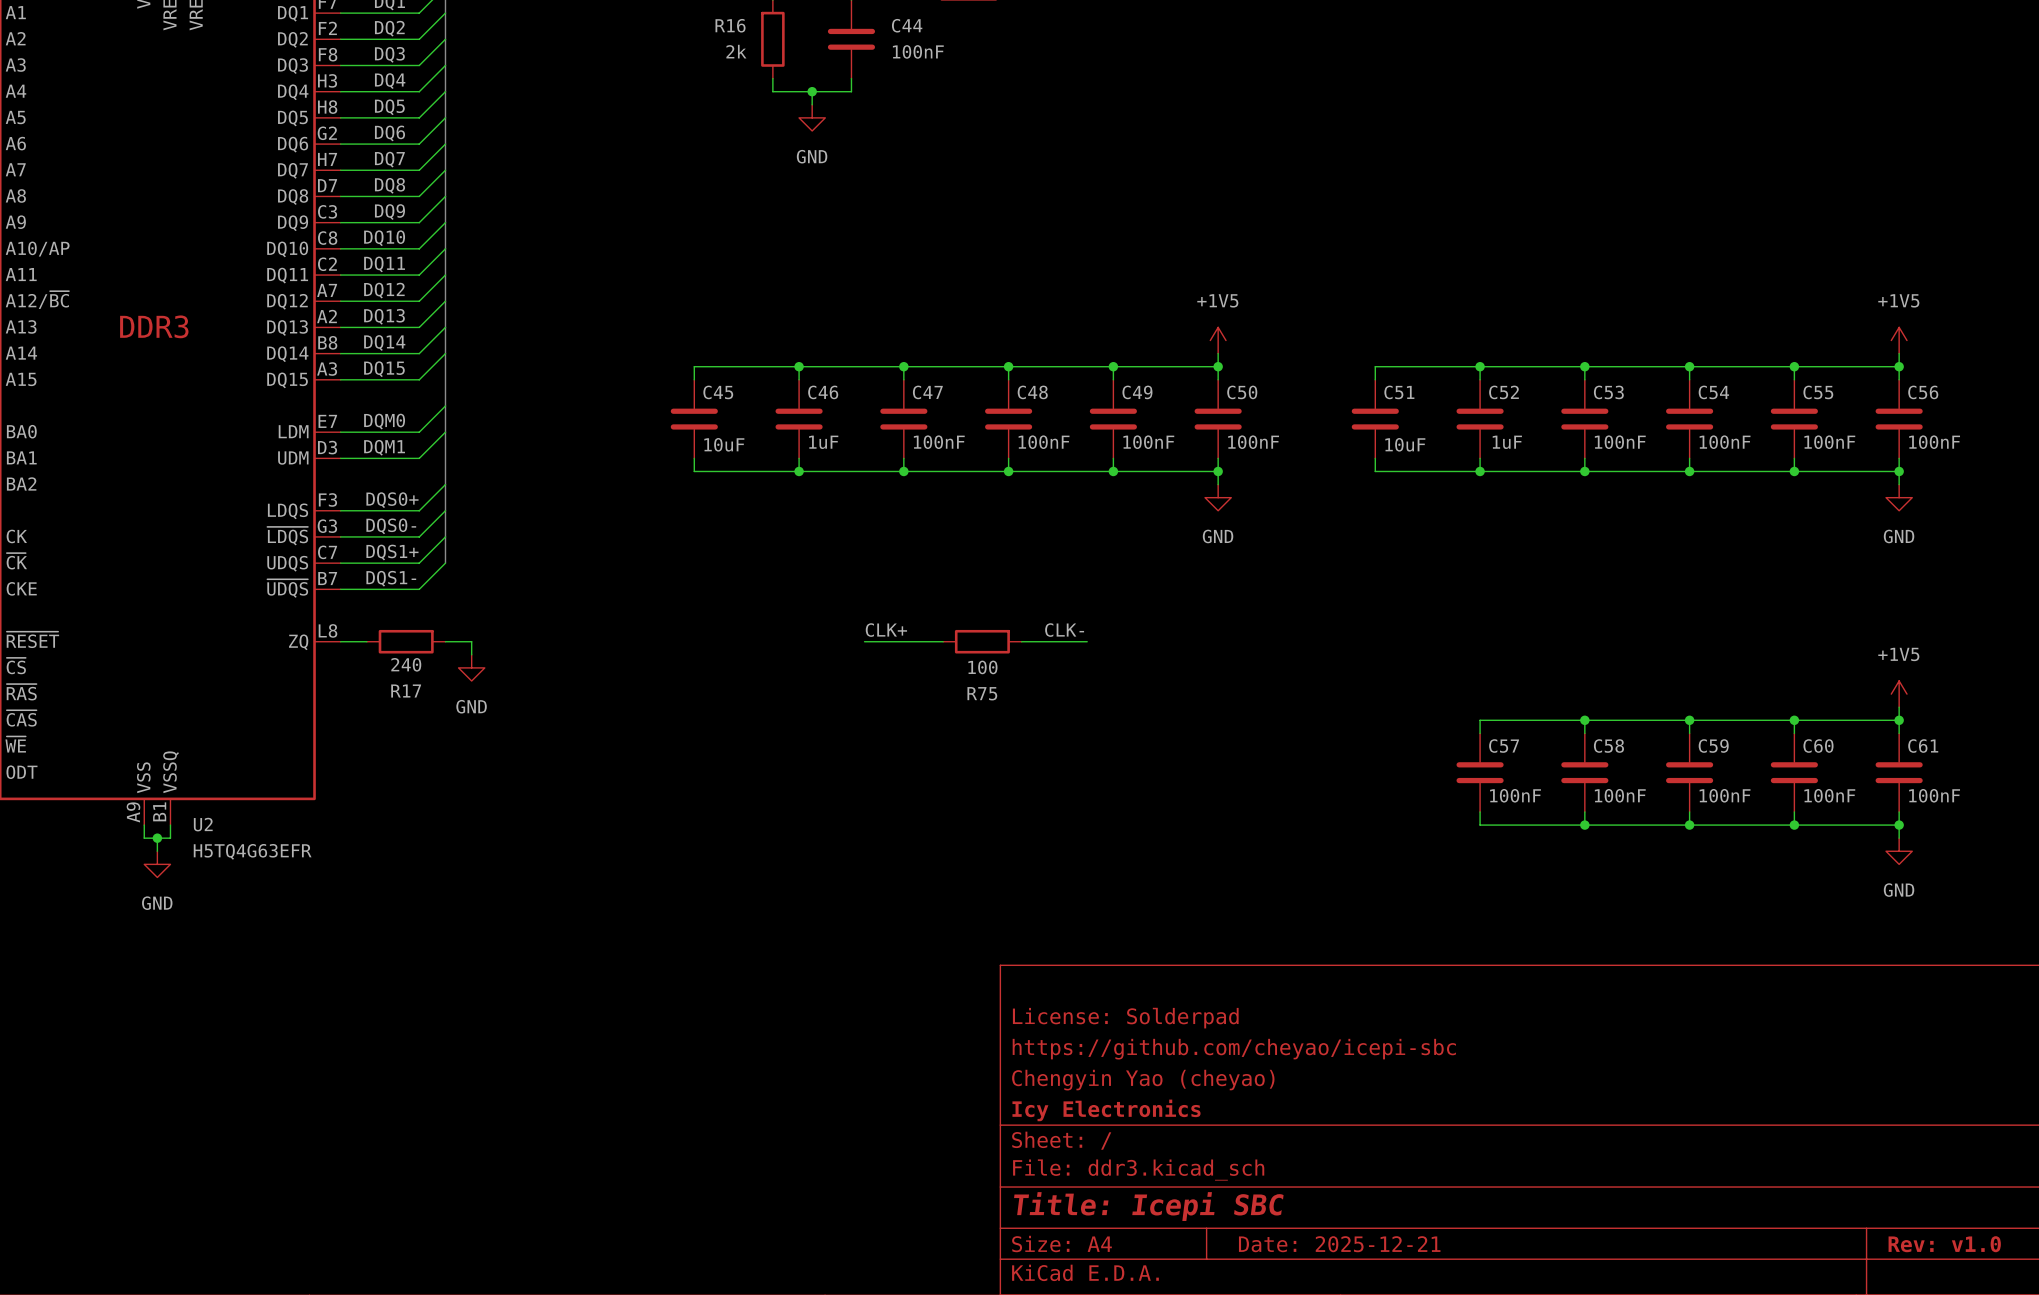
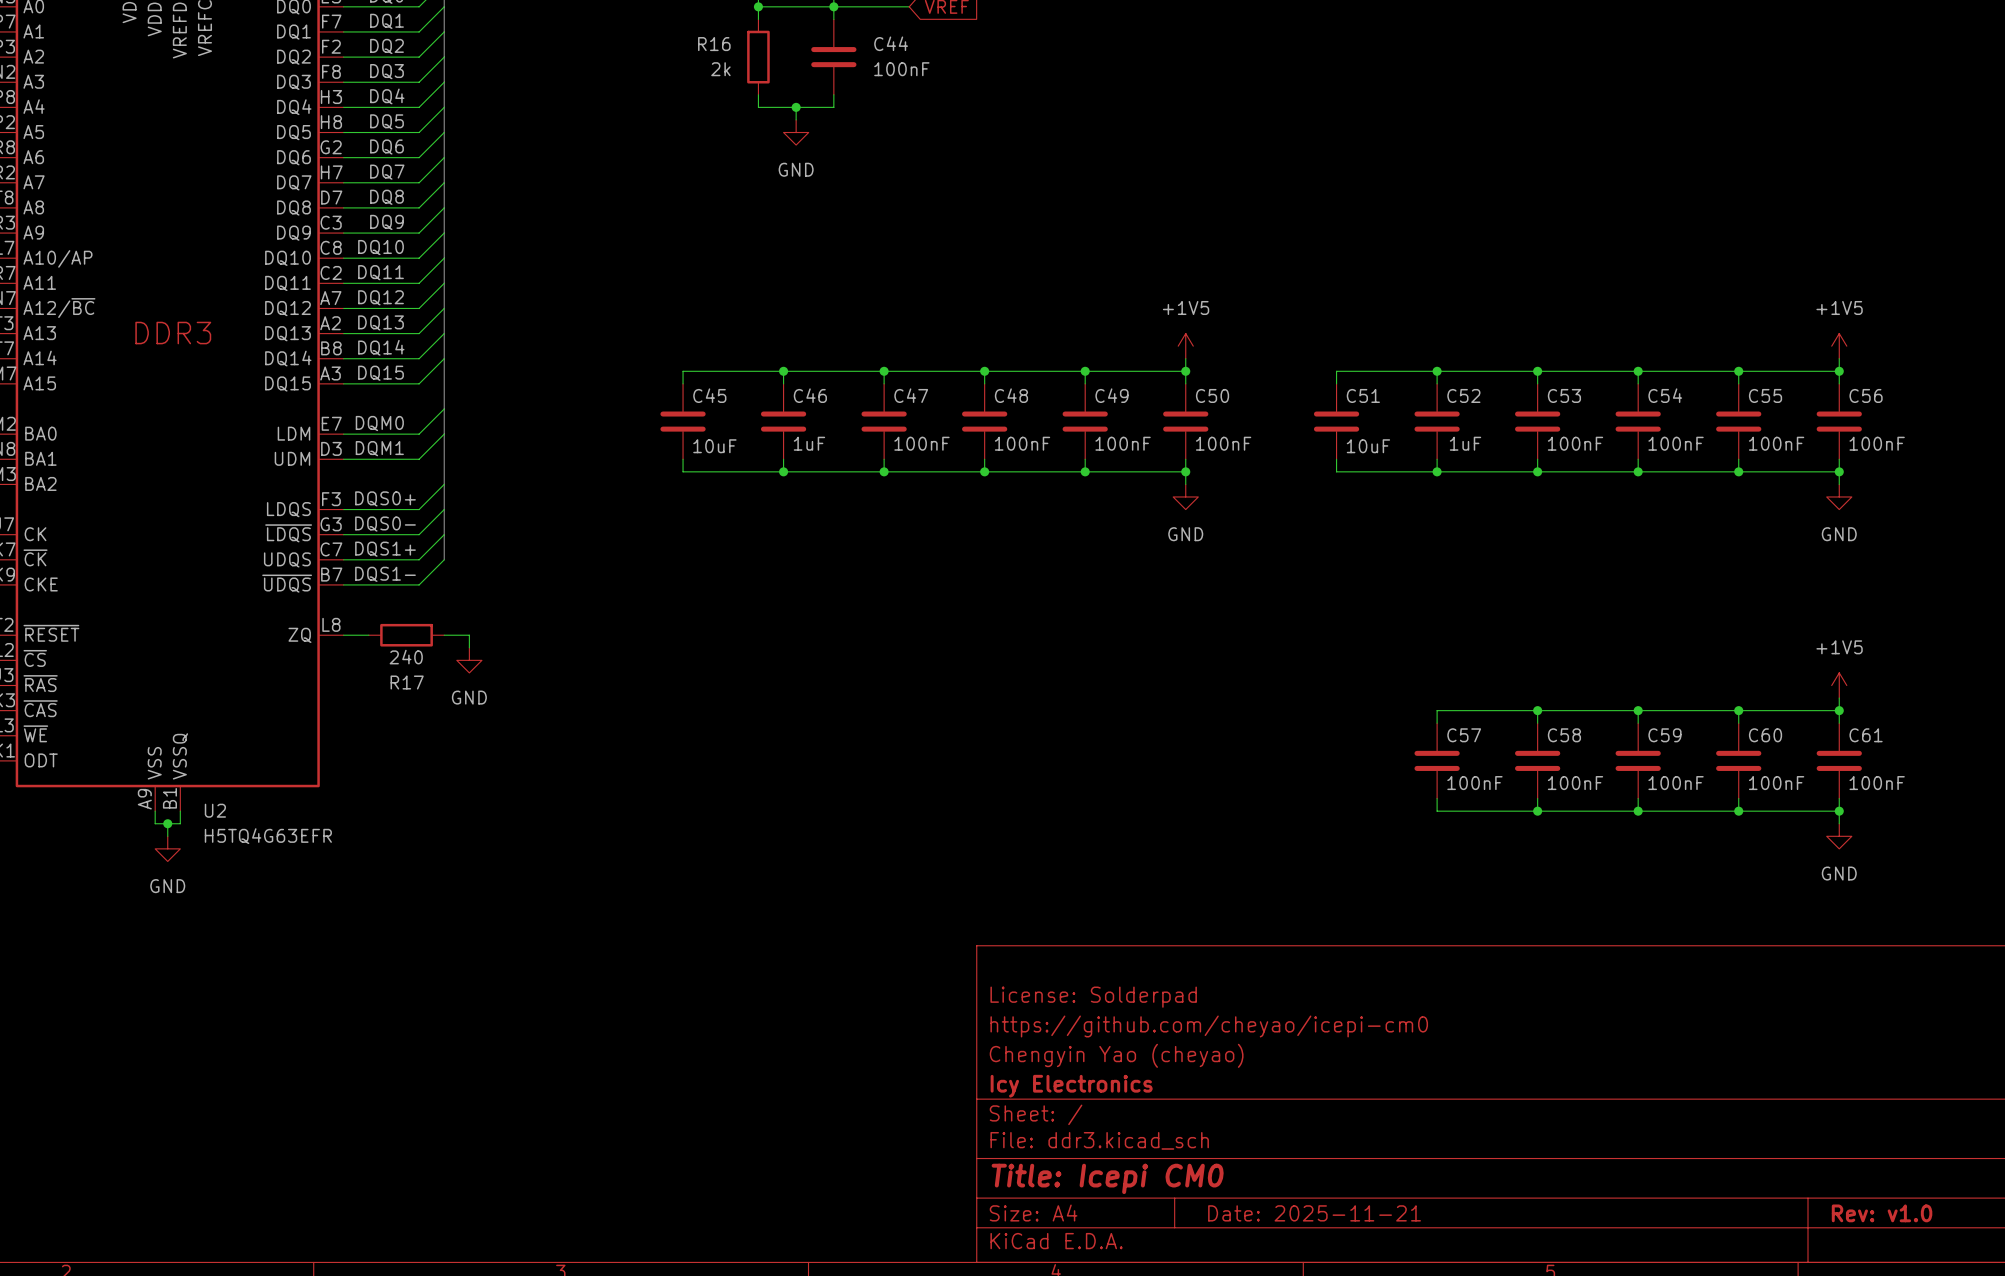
label: CLK+ (886, 630) -> none
label: CLK- (1064, 630) -> none
wire: (864, 641) (943, 641) -> none
R75: 100 (982, 641) -> none
wire: (1021, 641) (1087, 641) -> none
title block: https://github.com/cheyao/icepi-sbc (1234, 1049) -> https://github.com/cheyao/icepi-cm0 (1209, 1026)
title block: Title: Icepi SBC (1148, 1206) -> Title: Icepi CM0 (1107, 1178)
title block: Date: 2025-12-21 (1339, 1244) -> Date: 2025-11-21 (1314, 1213)

